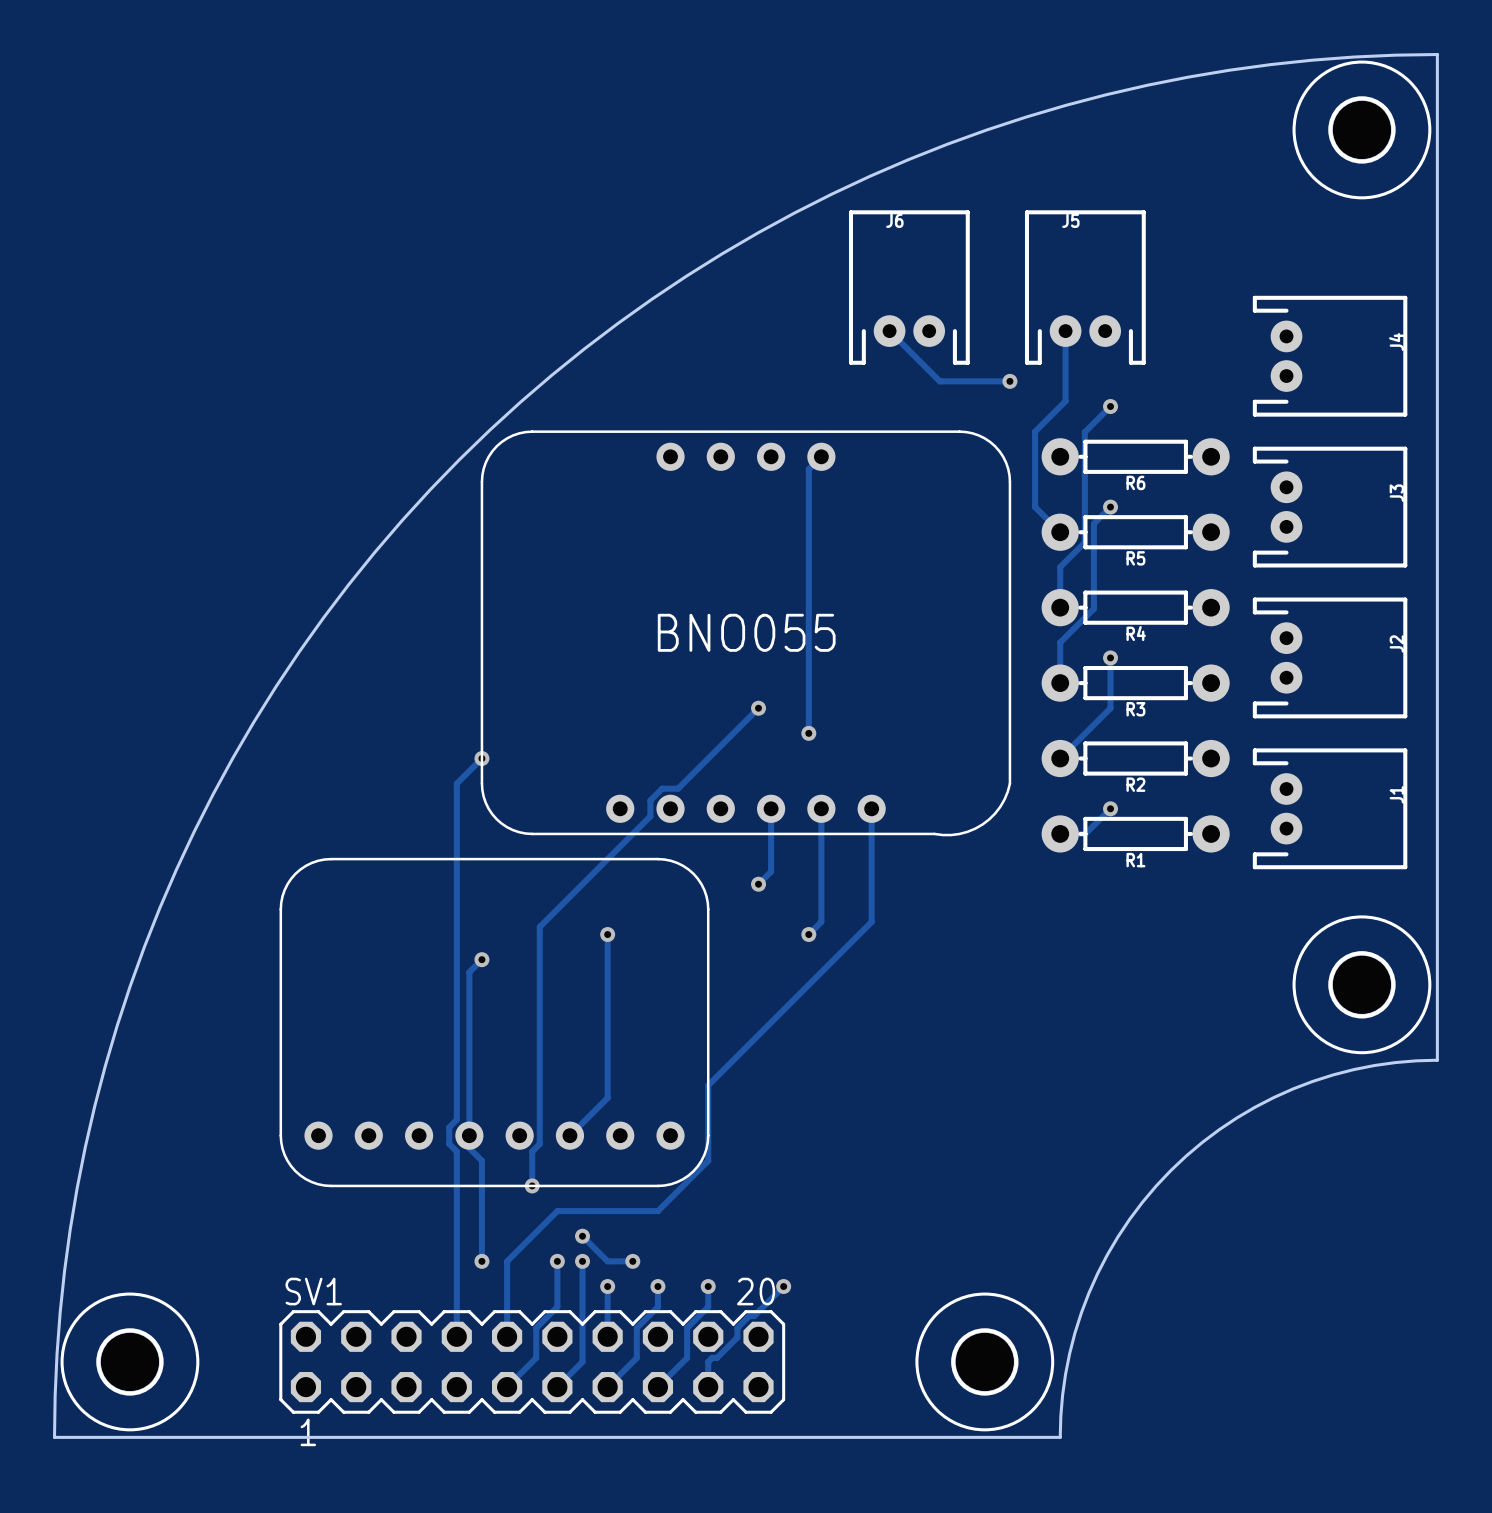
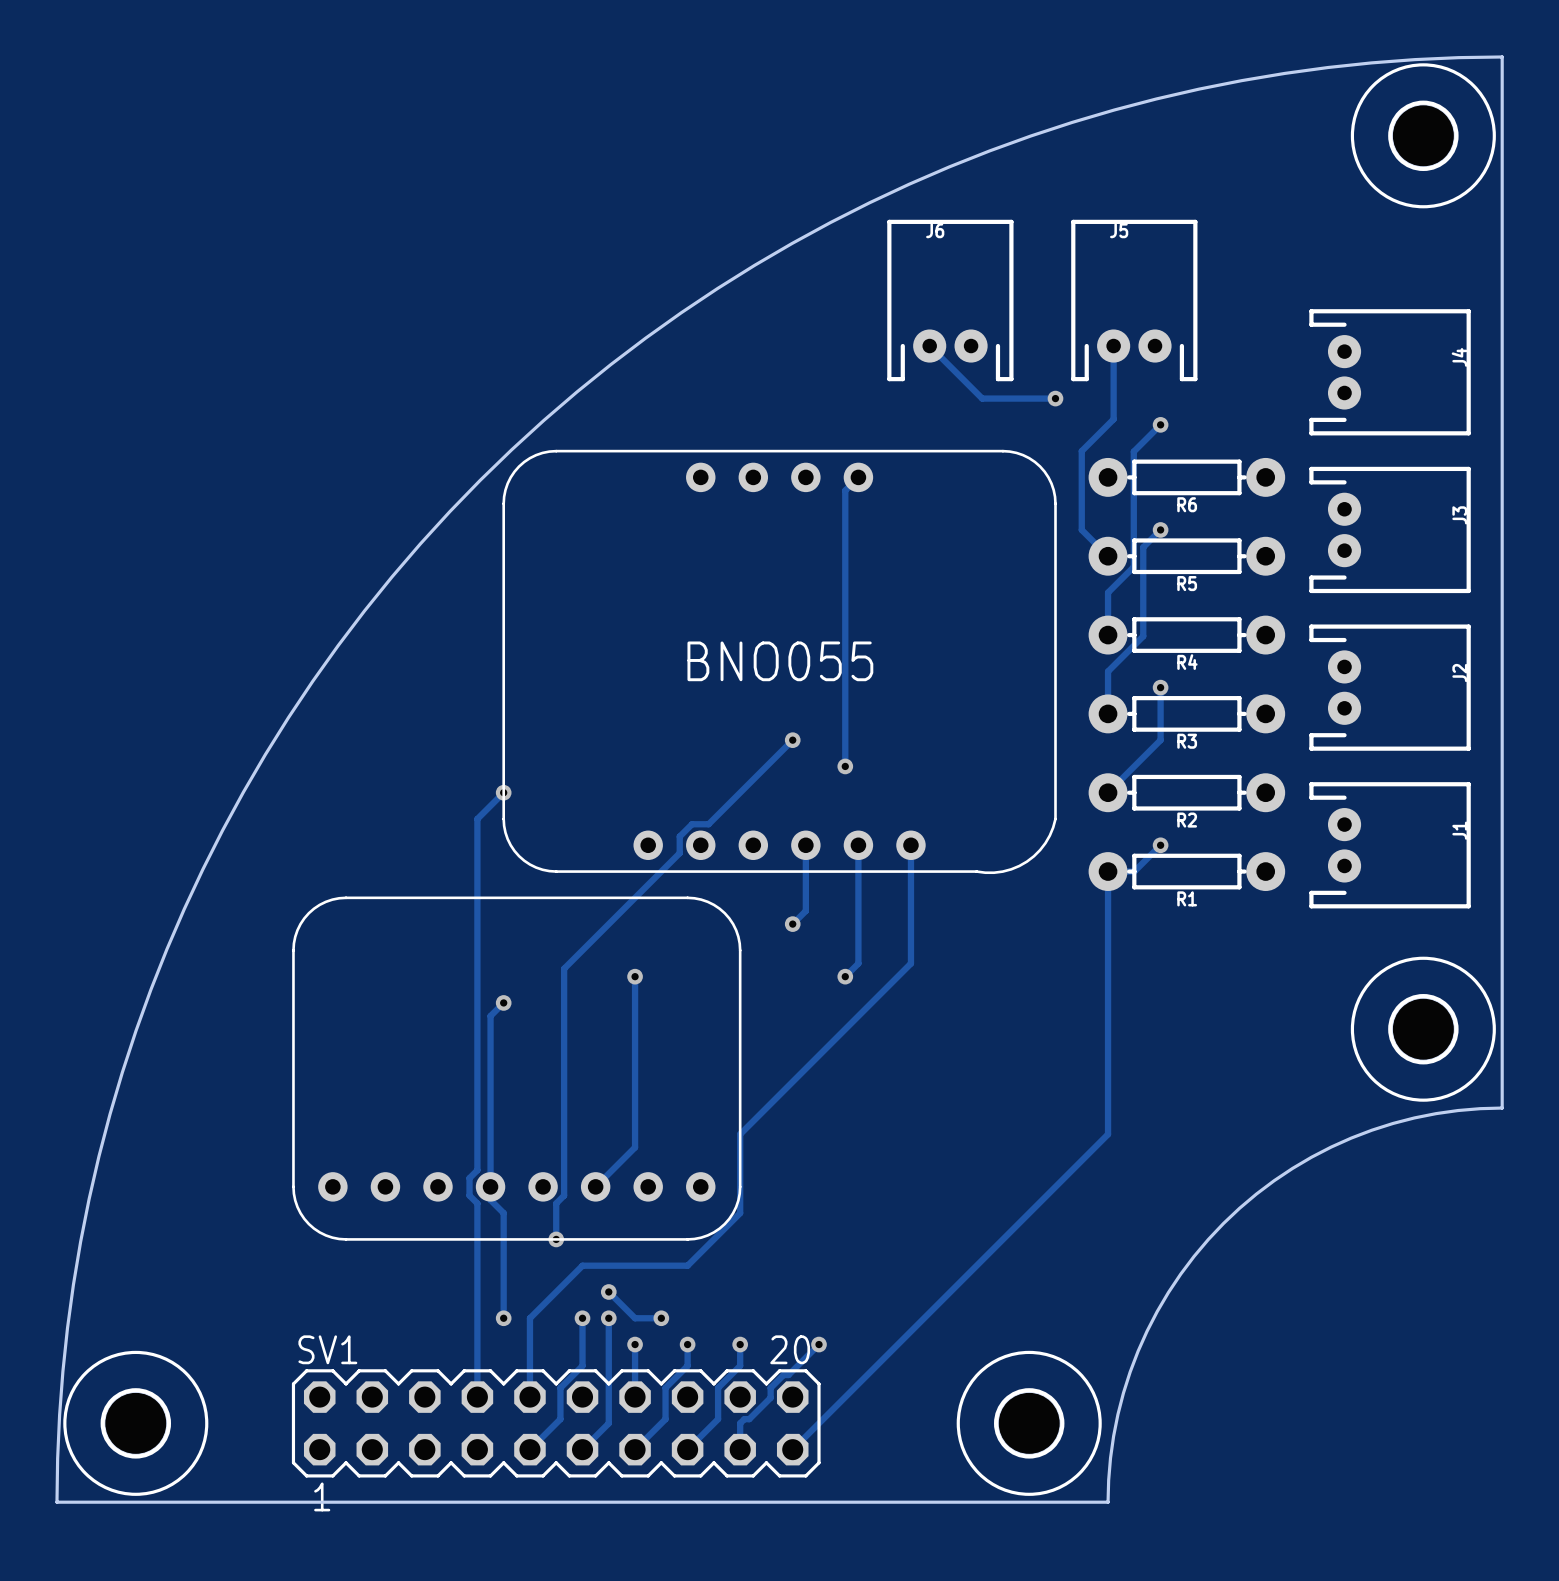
track: none -> (1108, 871) (1108, 1134) (792, 1449)

